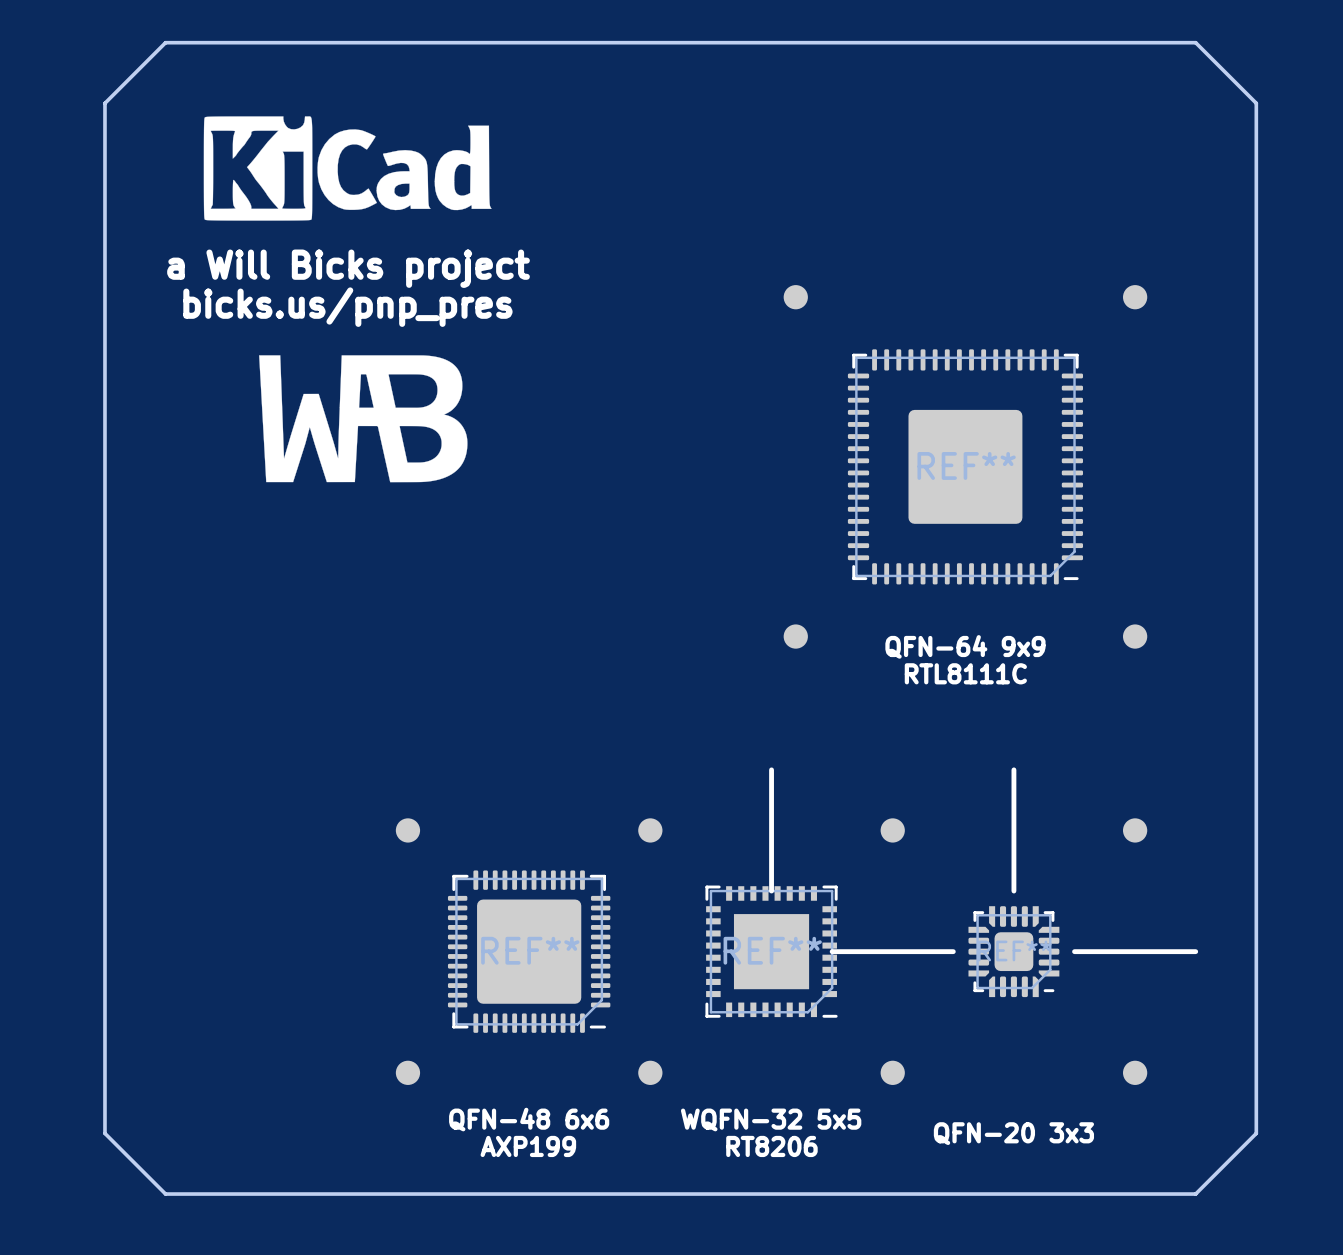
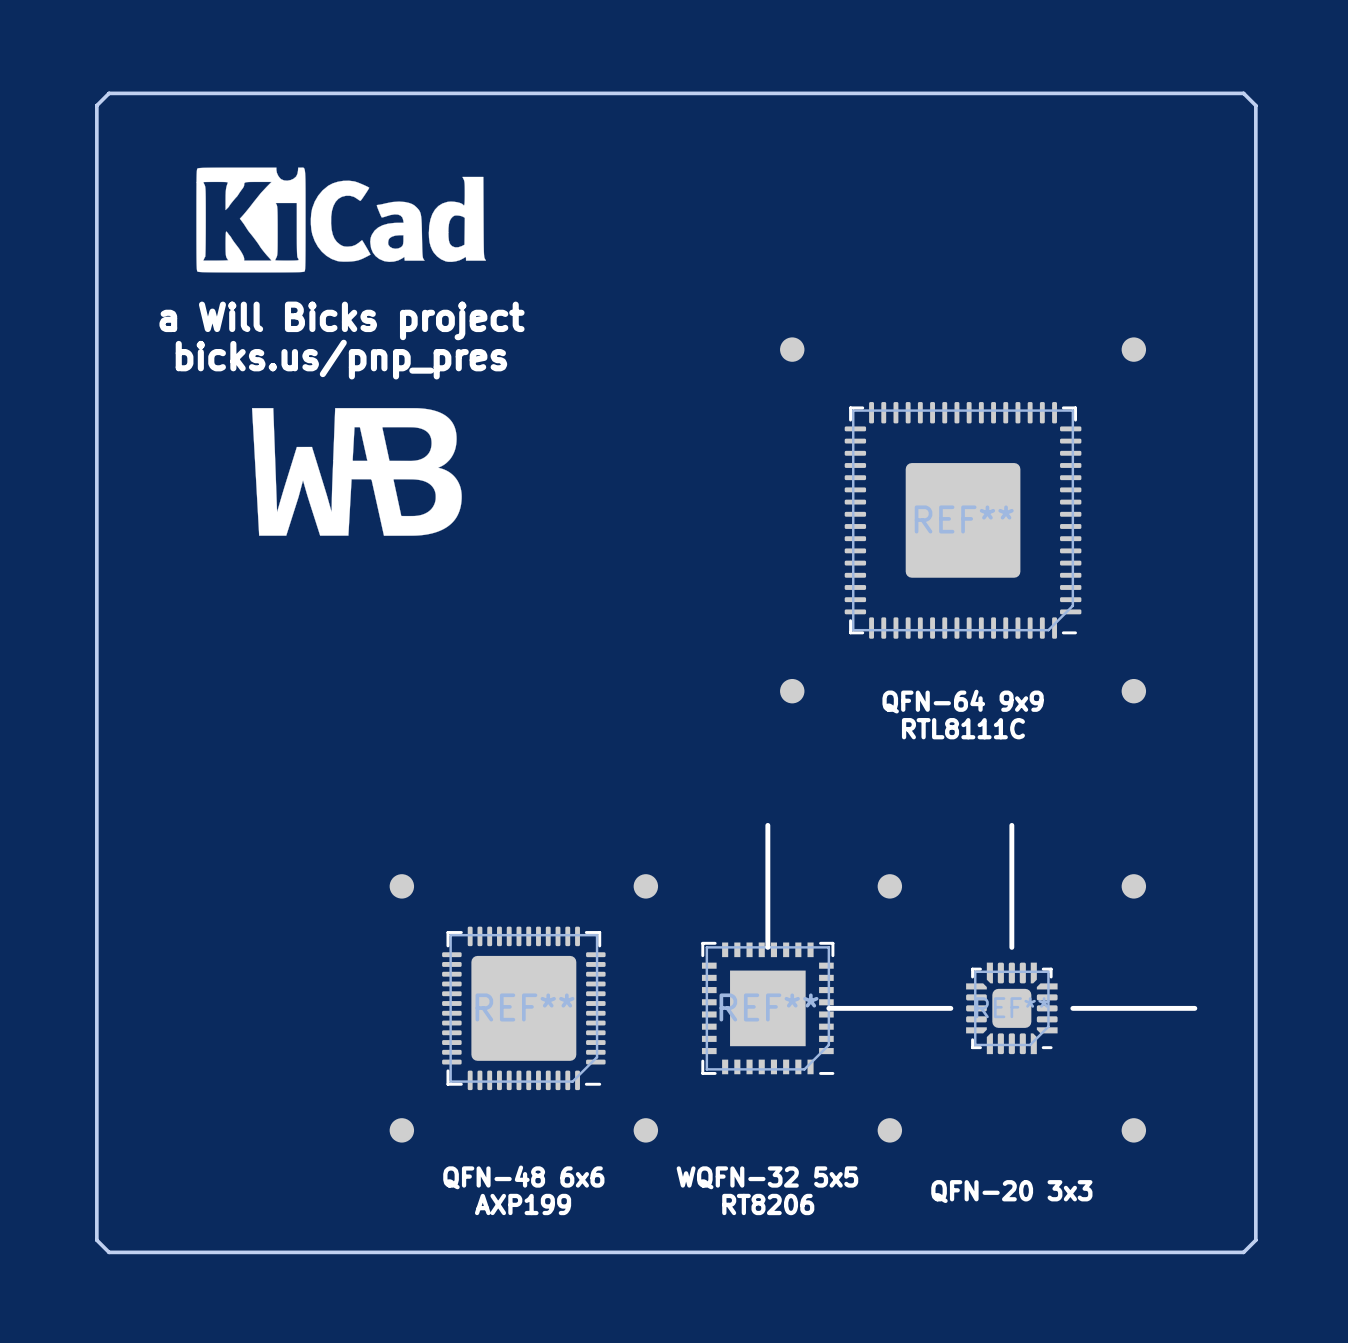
board edge: (165, 42) (104, 103) -> (157, 93) (109, 93) (96, 105) (96, 154)
board edge: (1195, 42) (1256, 103) -> (1194, 93) (1243, 93) (1255, 105) (1255, 154)
board edge: (104, 1133) (165, 1194) -> (96, 1191) (96, 1240) (109, 1252) (157, 1252)
board edge: (1256, 1133) (1195, 1194) -> (1255, 1191) (1255, 1240) (1243, 1252) (1194, 1252)

